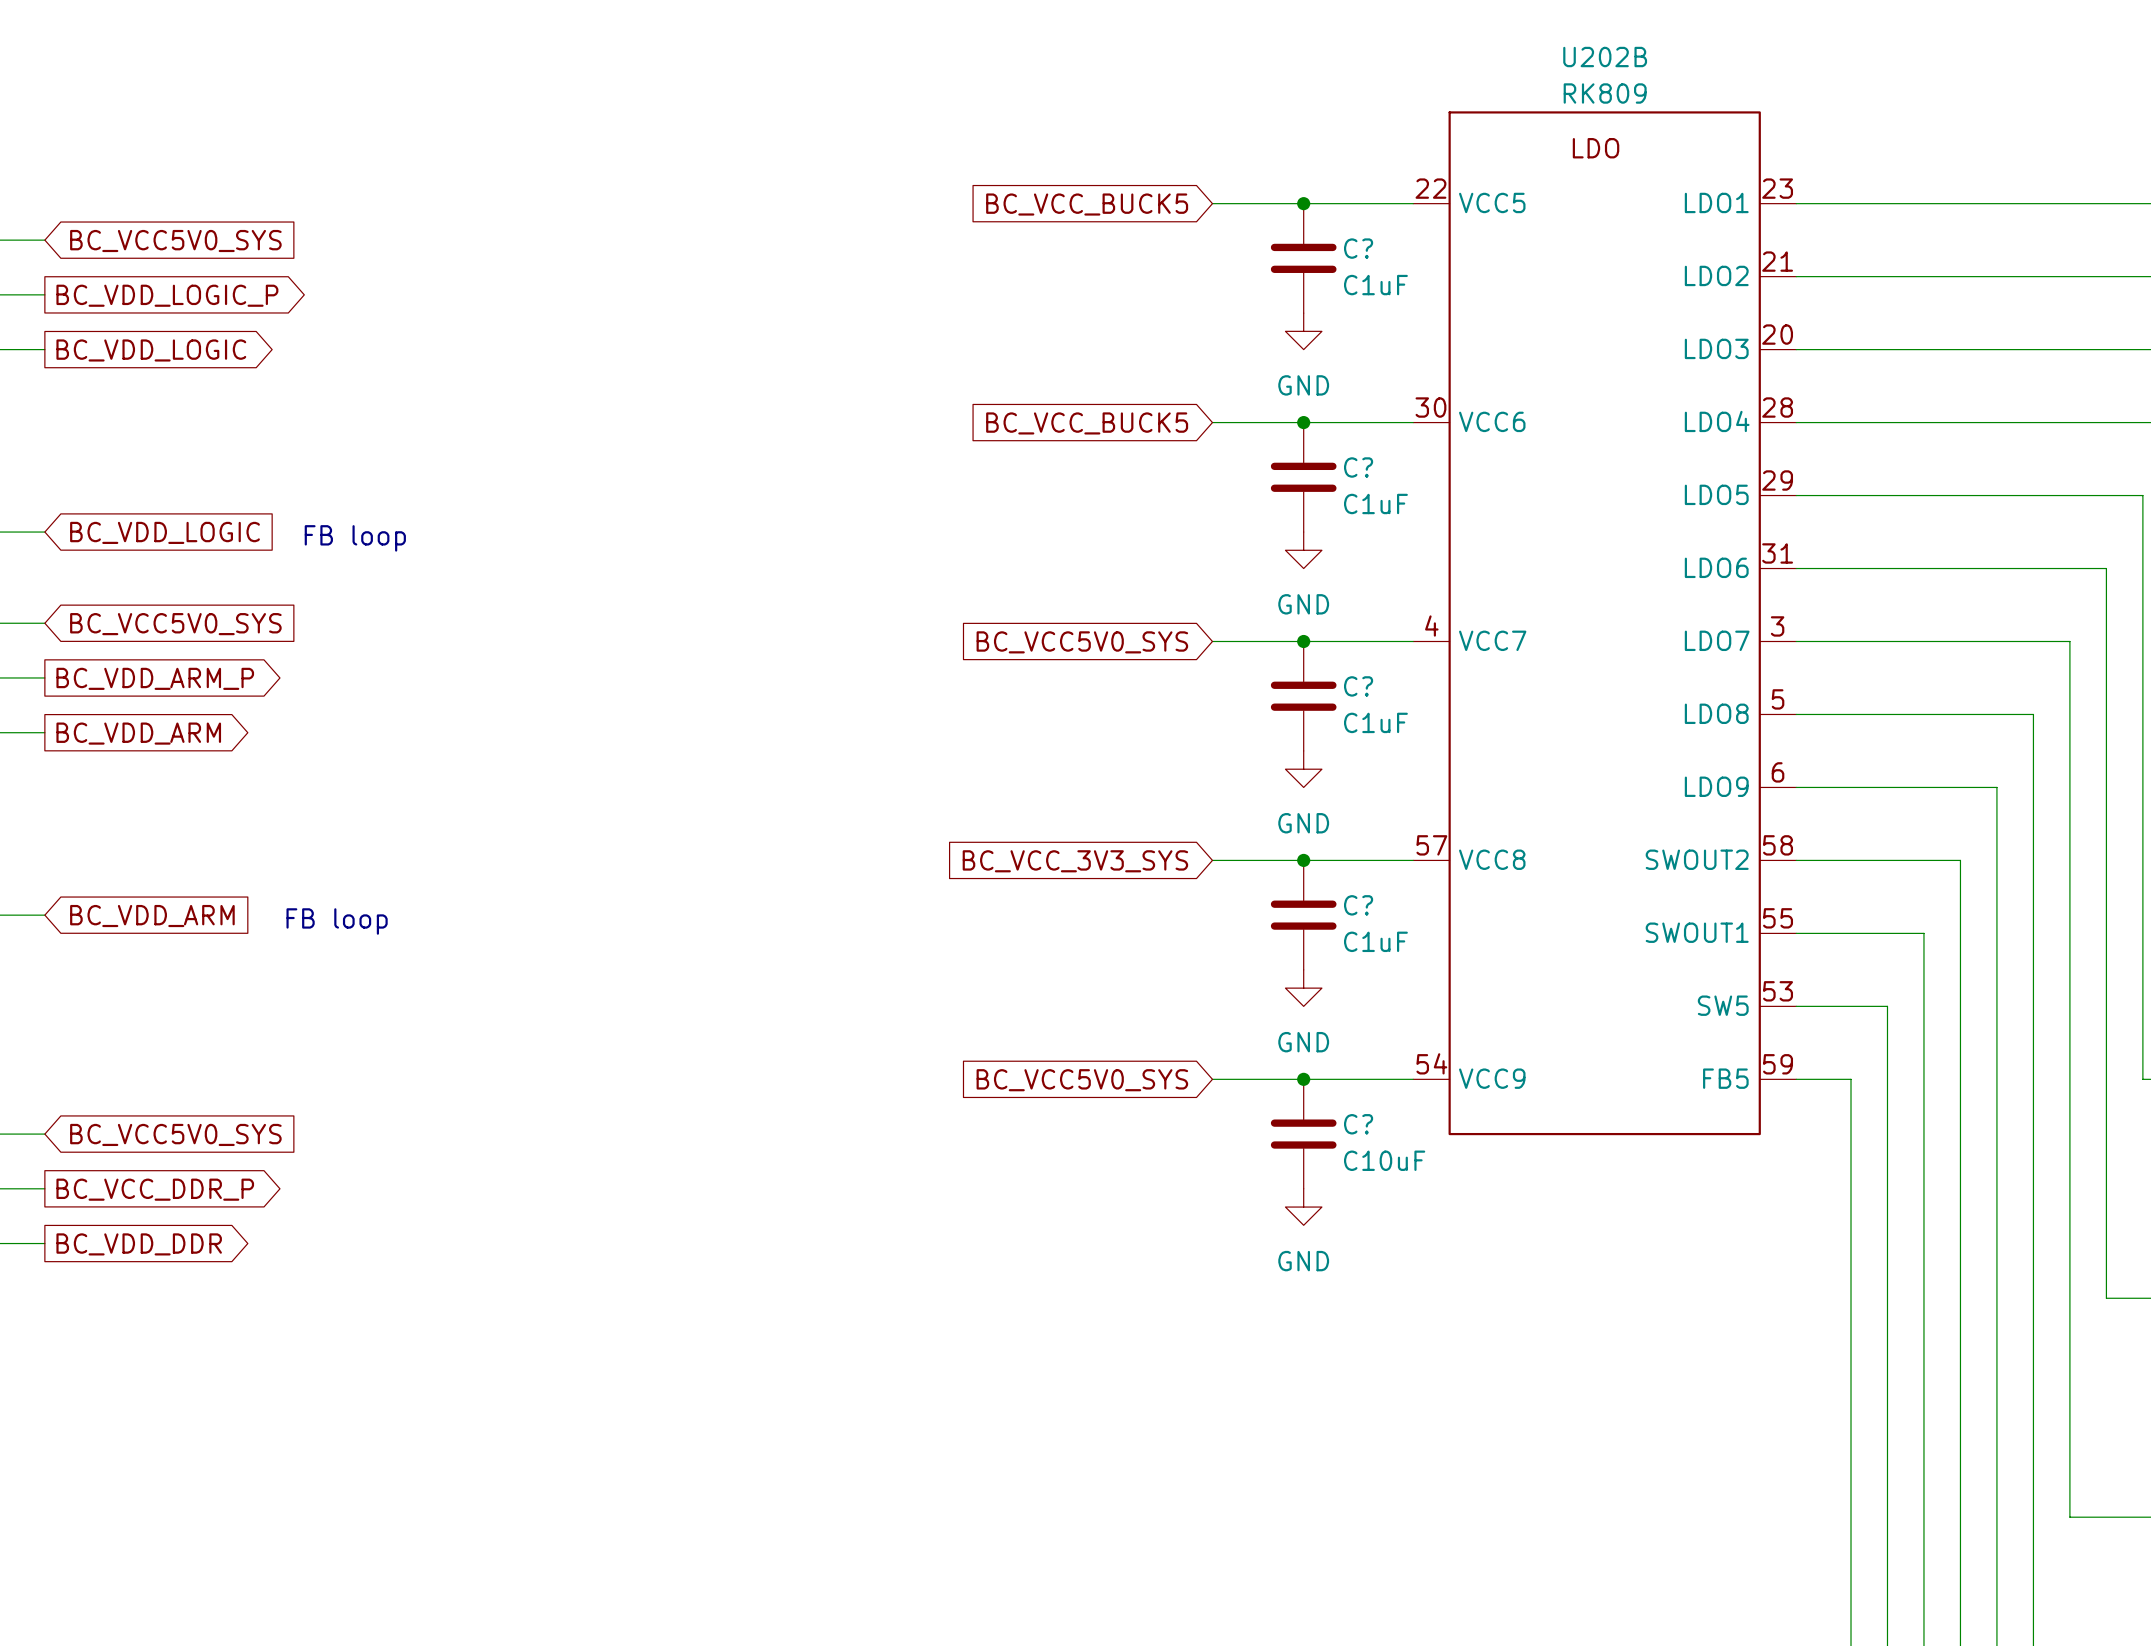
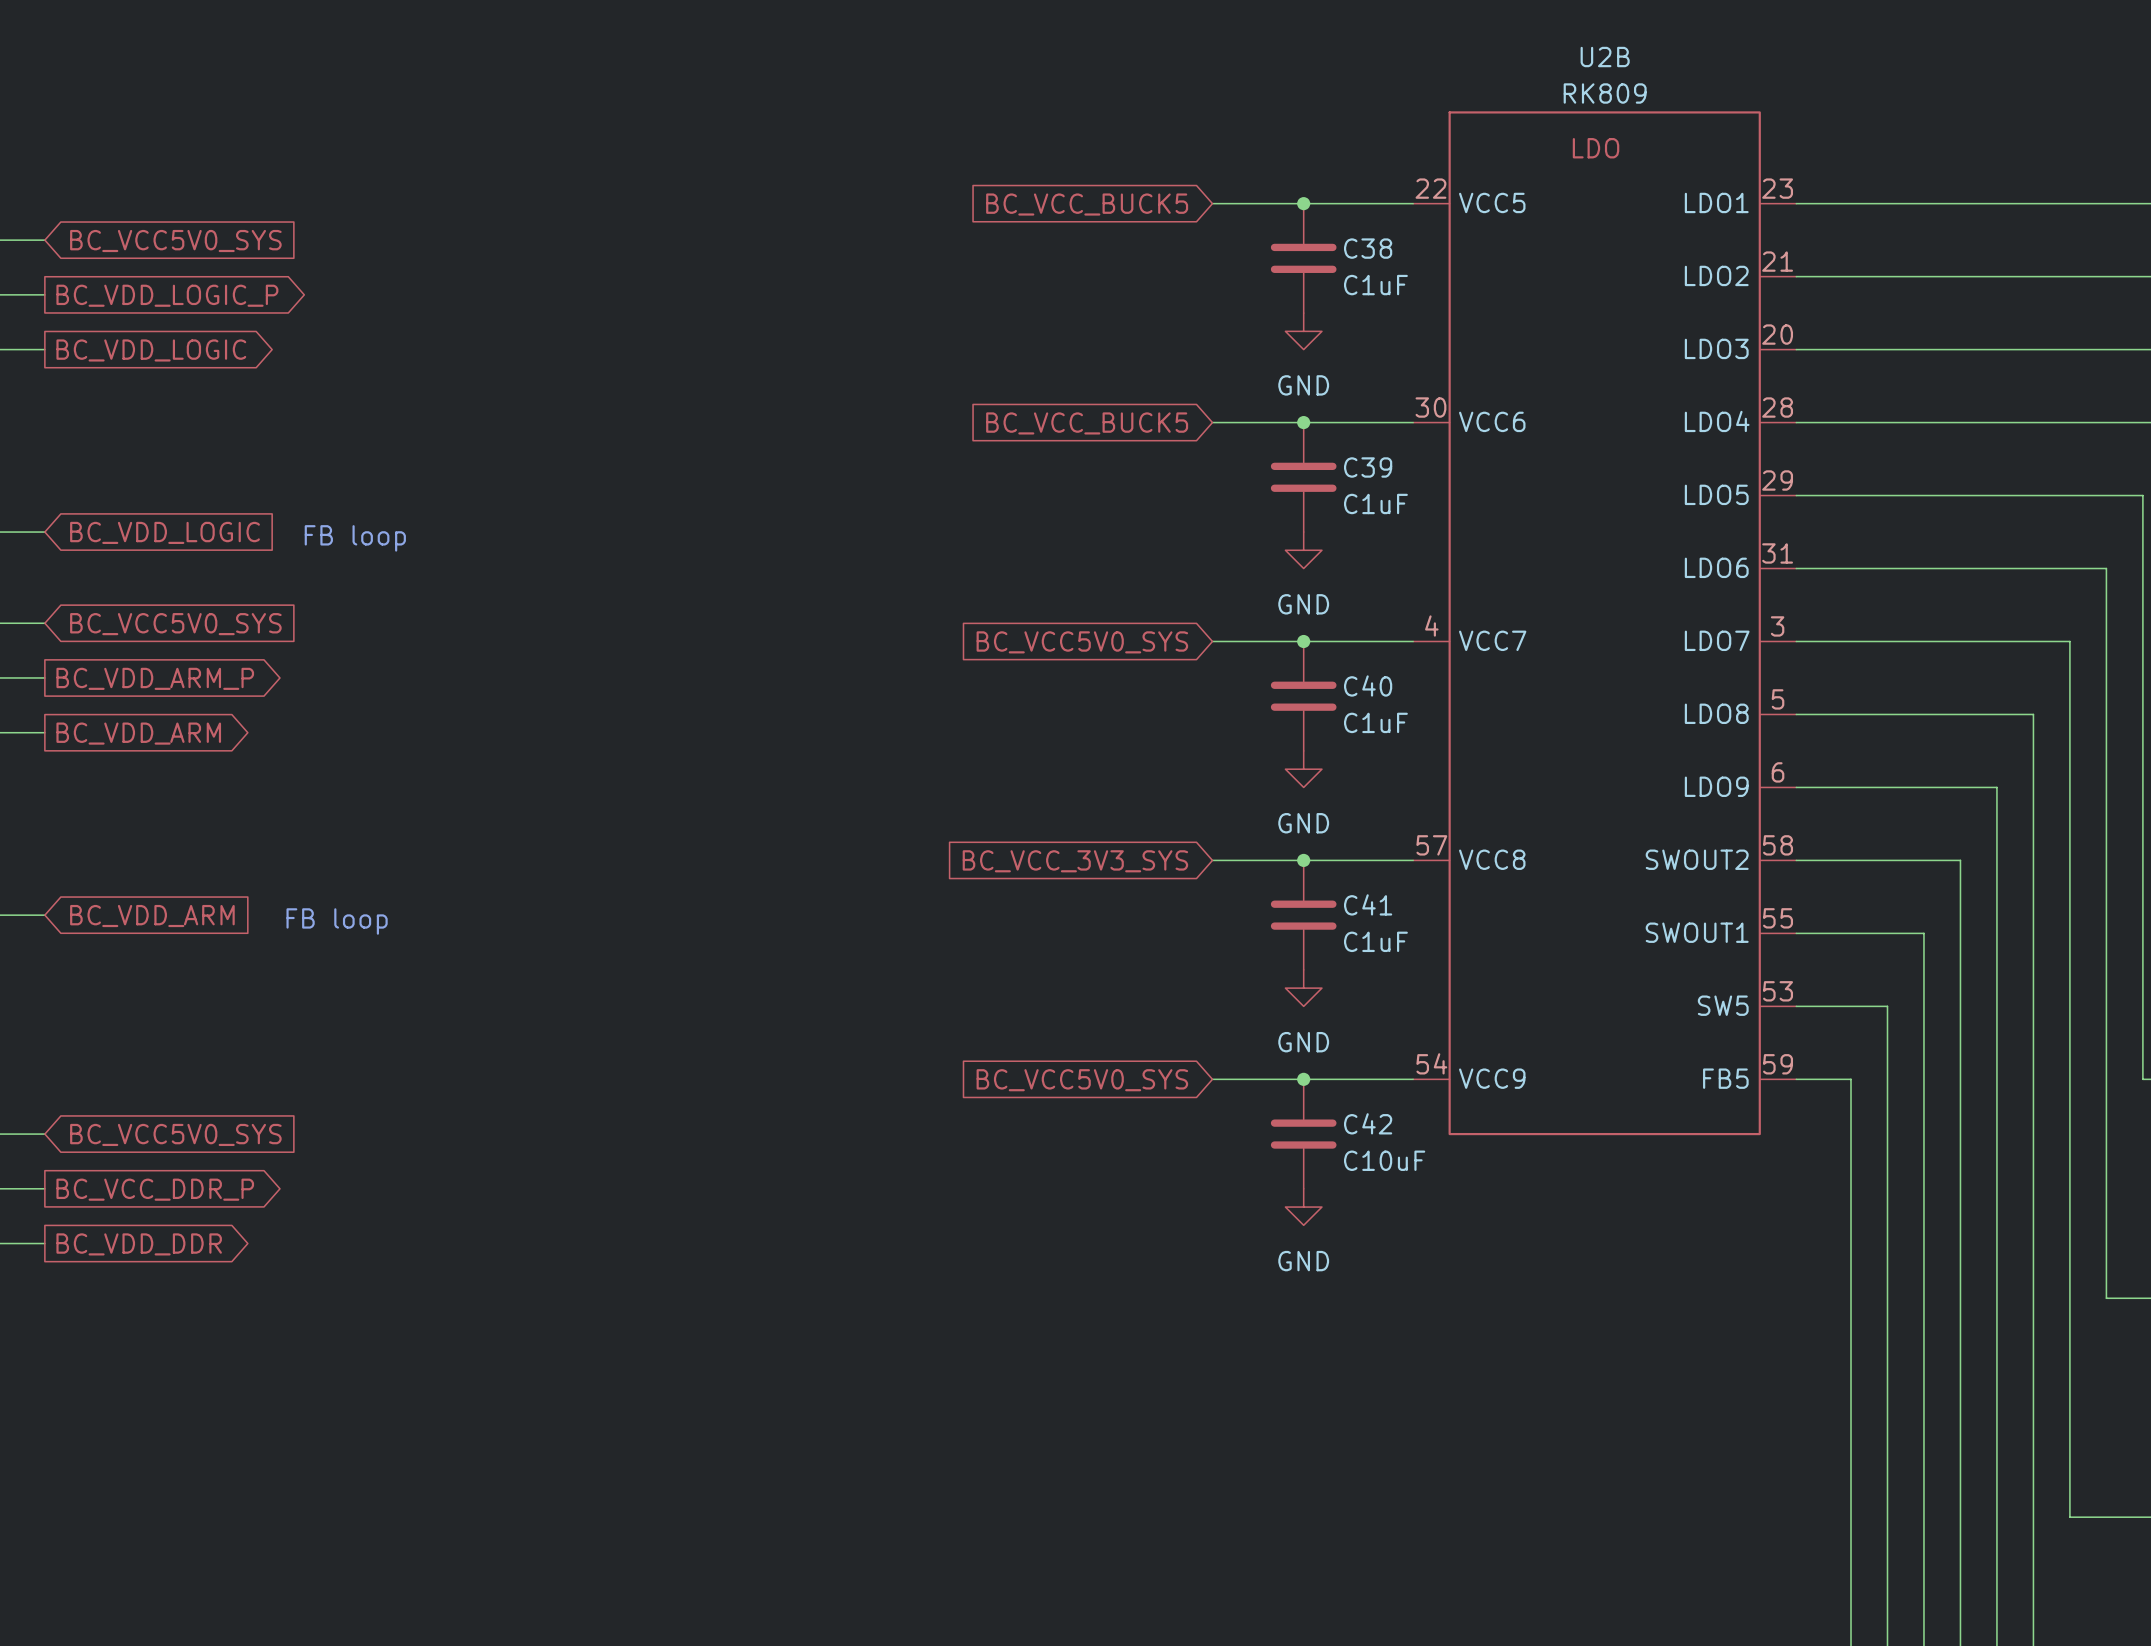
U202B name: U202B (1605, 57) -> U2B (1605, 57)
C? name: C? (1358, 248) -> C38 (1368, 248)
C? name: C? (1358, 467) -> C39 (1368, 467)
C? name: C? (1358, 686) -> C40 (1368, 685)
C? name: C? (1358, 905) -> C41 (1368, 904)
C? name: C? (1358, 1124) -> C42 (1368, 1123)

